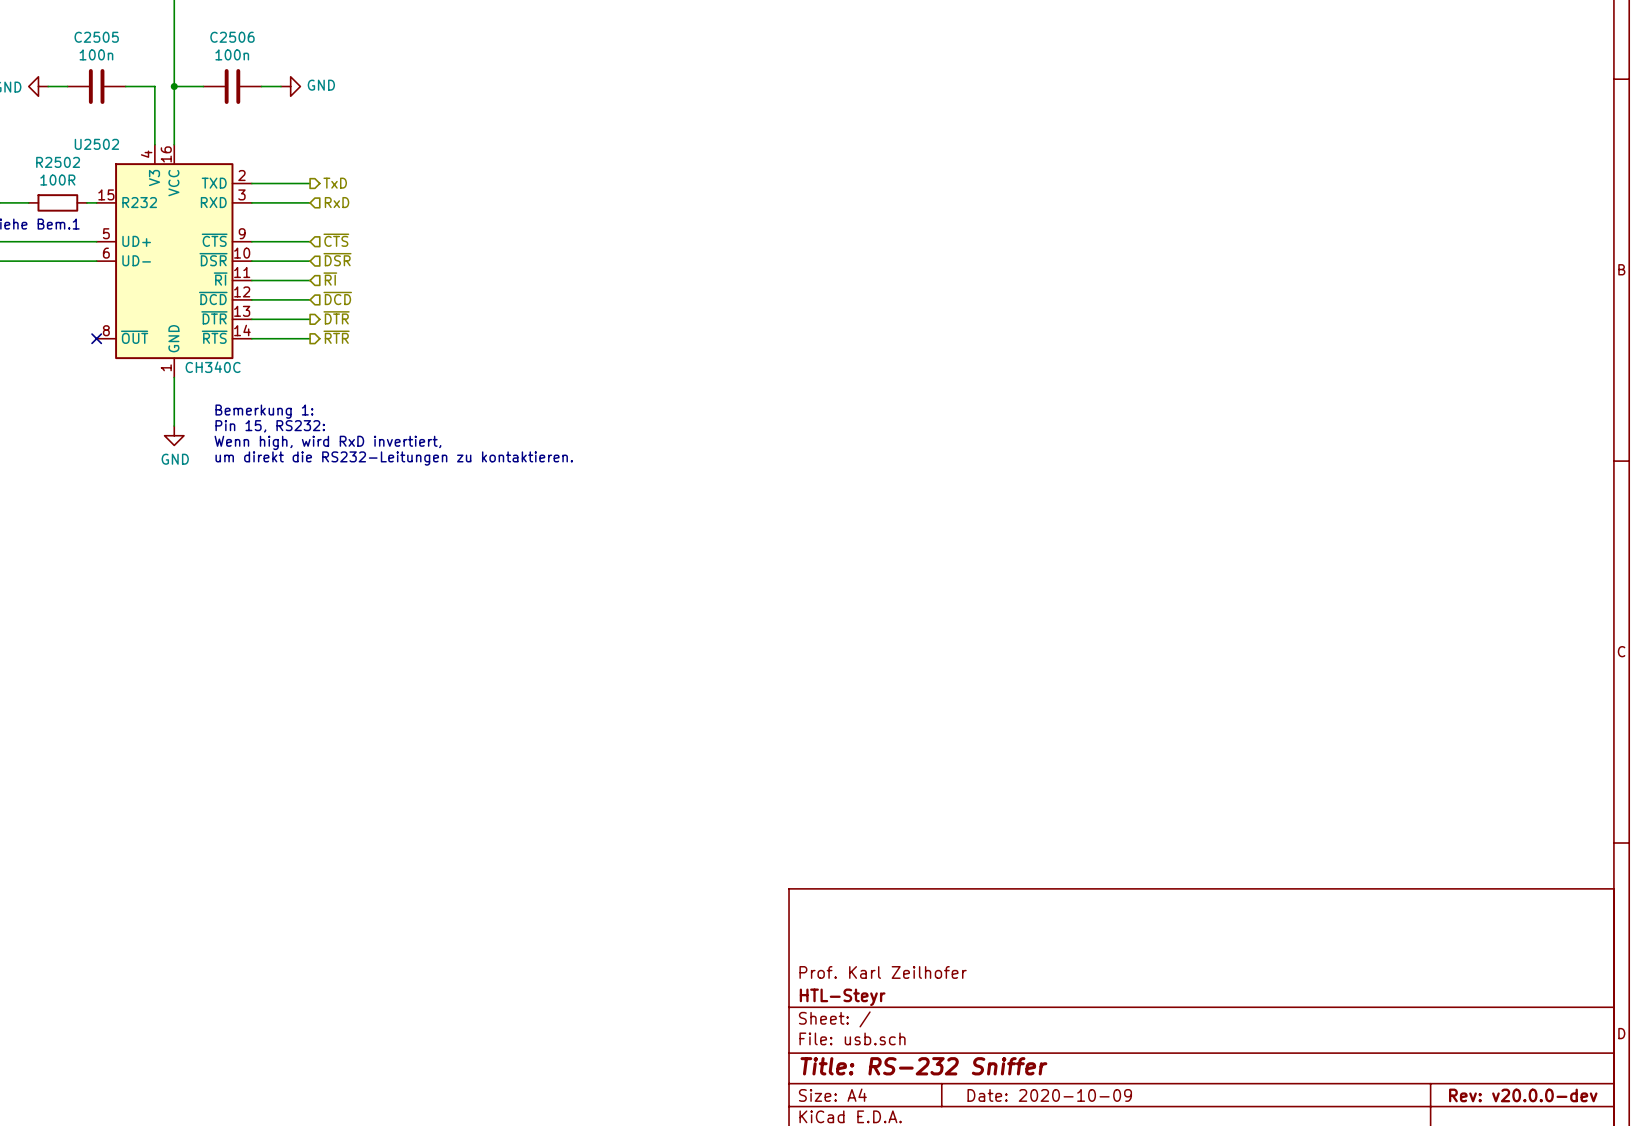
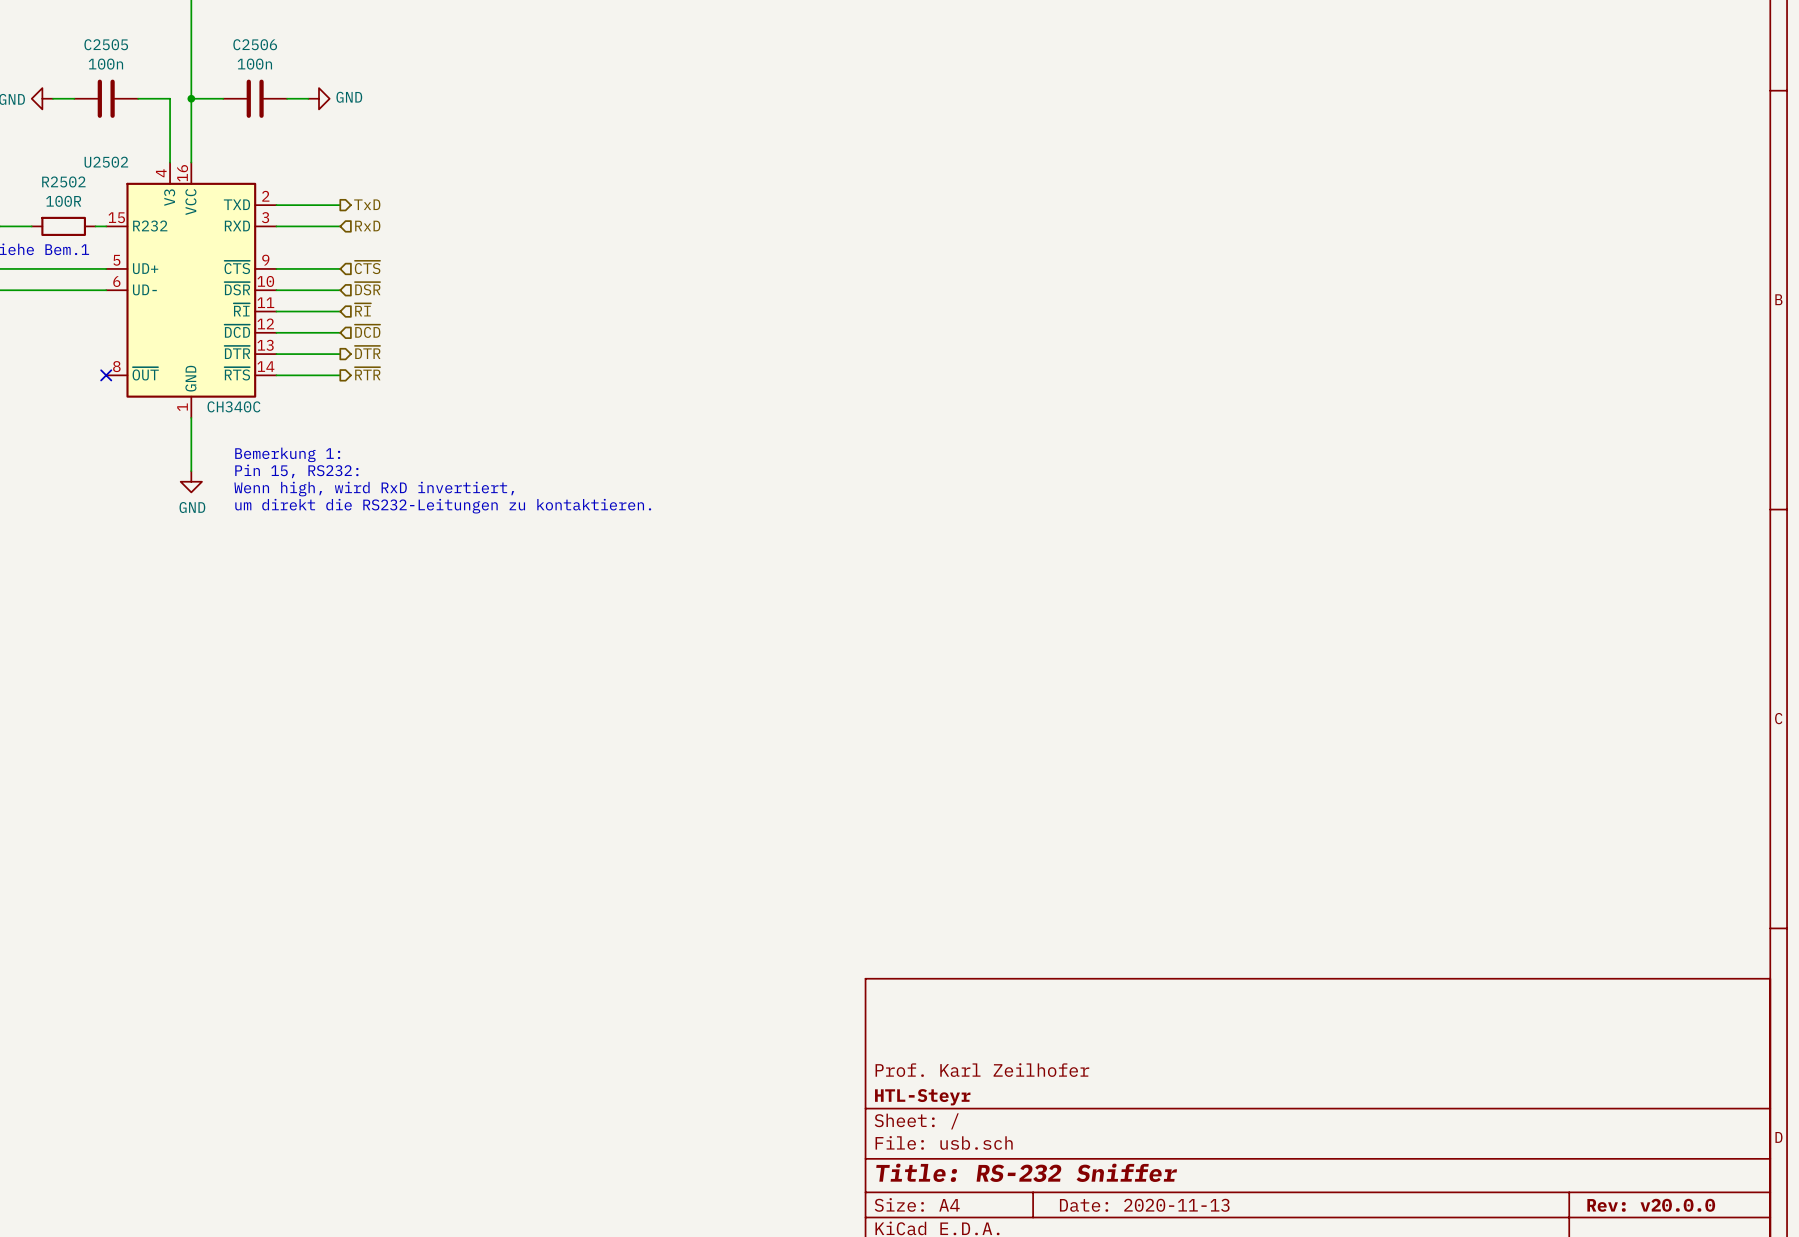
title block: Date: 2020-10-09 (1049, 1095) -> Date: 2020-11-13 (1144, 1205)
title block: Rev: v20.0.0-dev (1523, 1095) -> Rev: v20.0.0 (1651, 1205)

